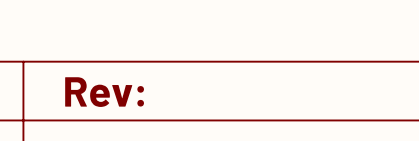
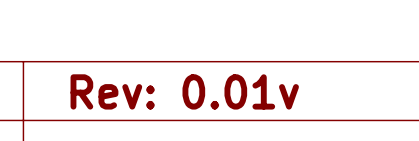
title block: Rev: (104, 92) -> Rev: 0.01v (184, 91)

